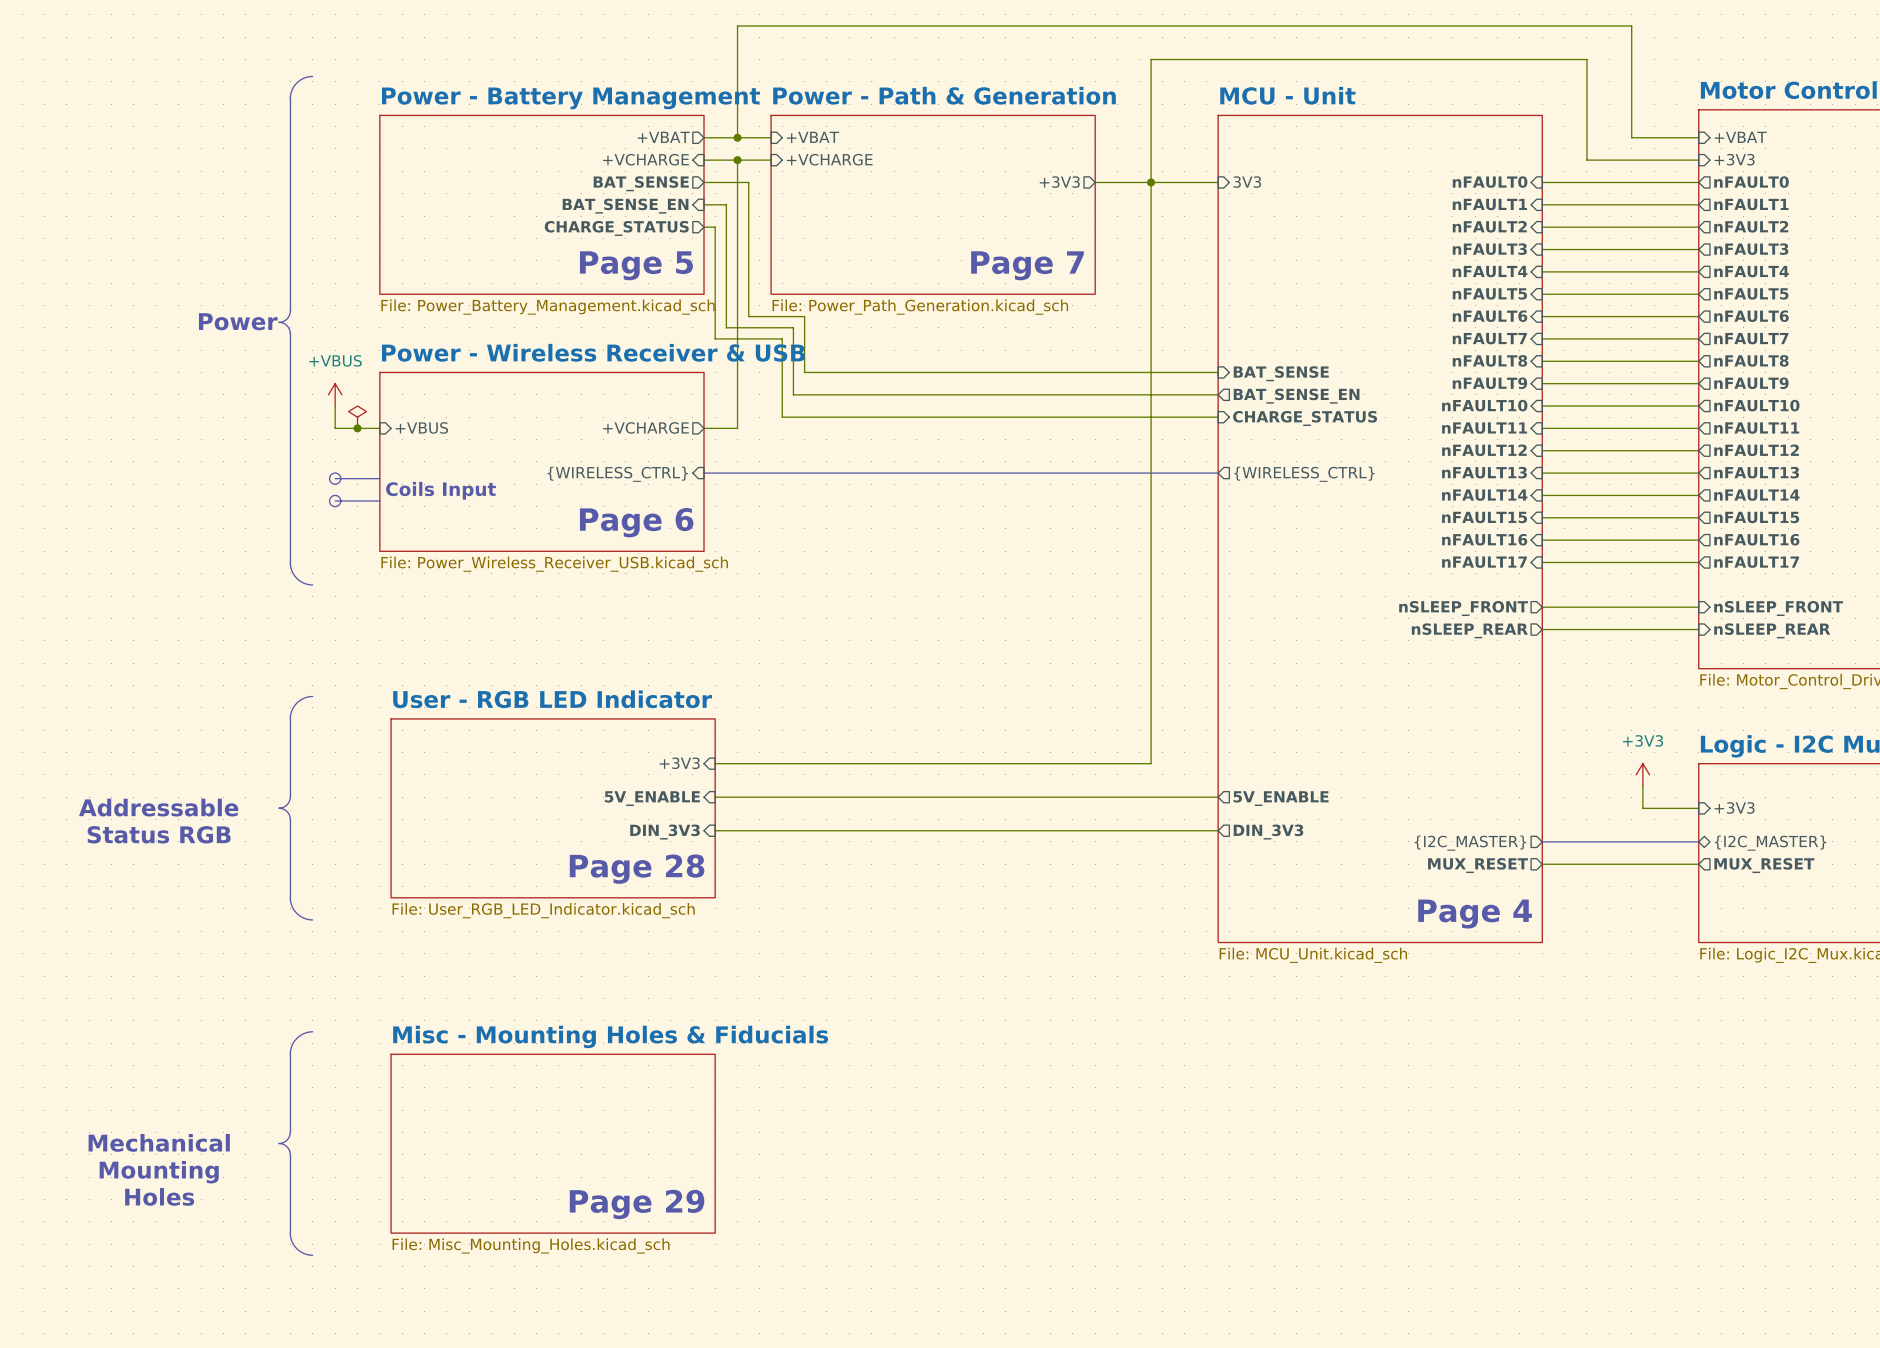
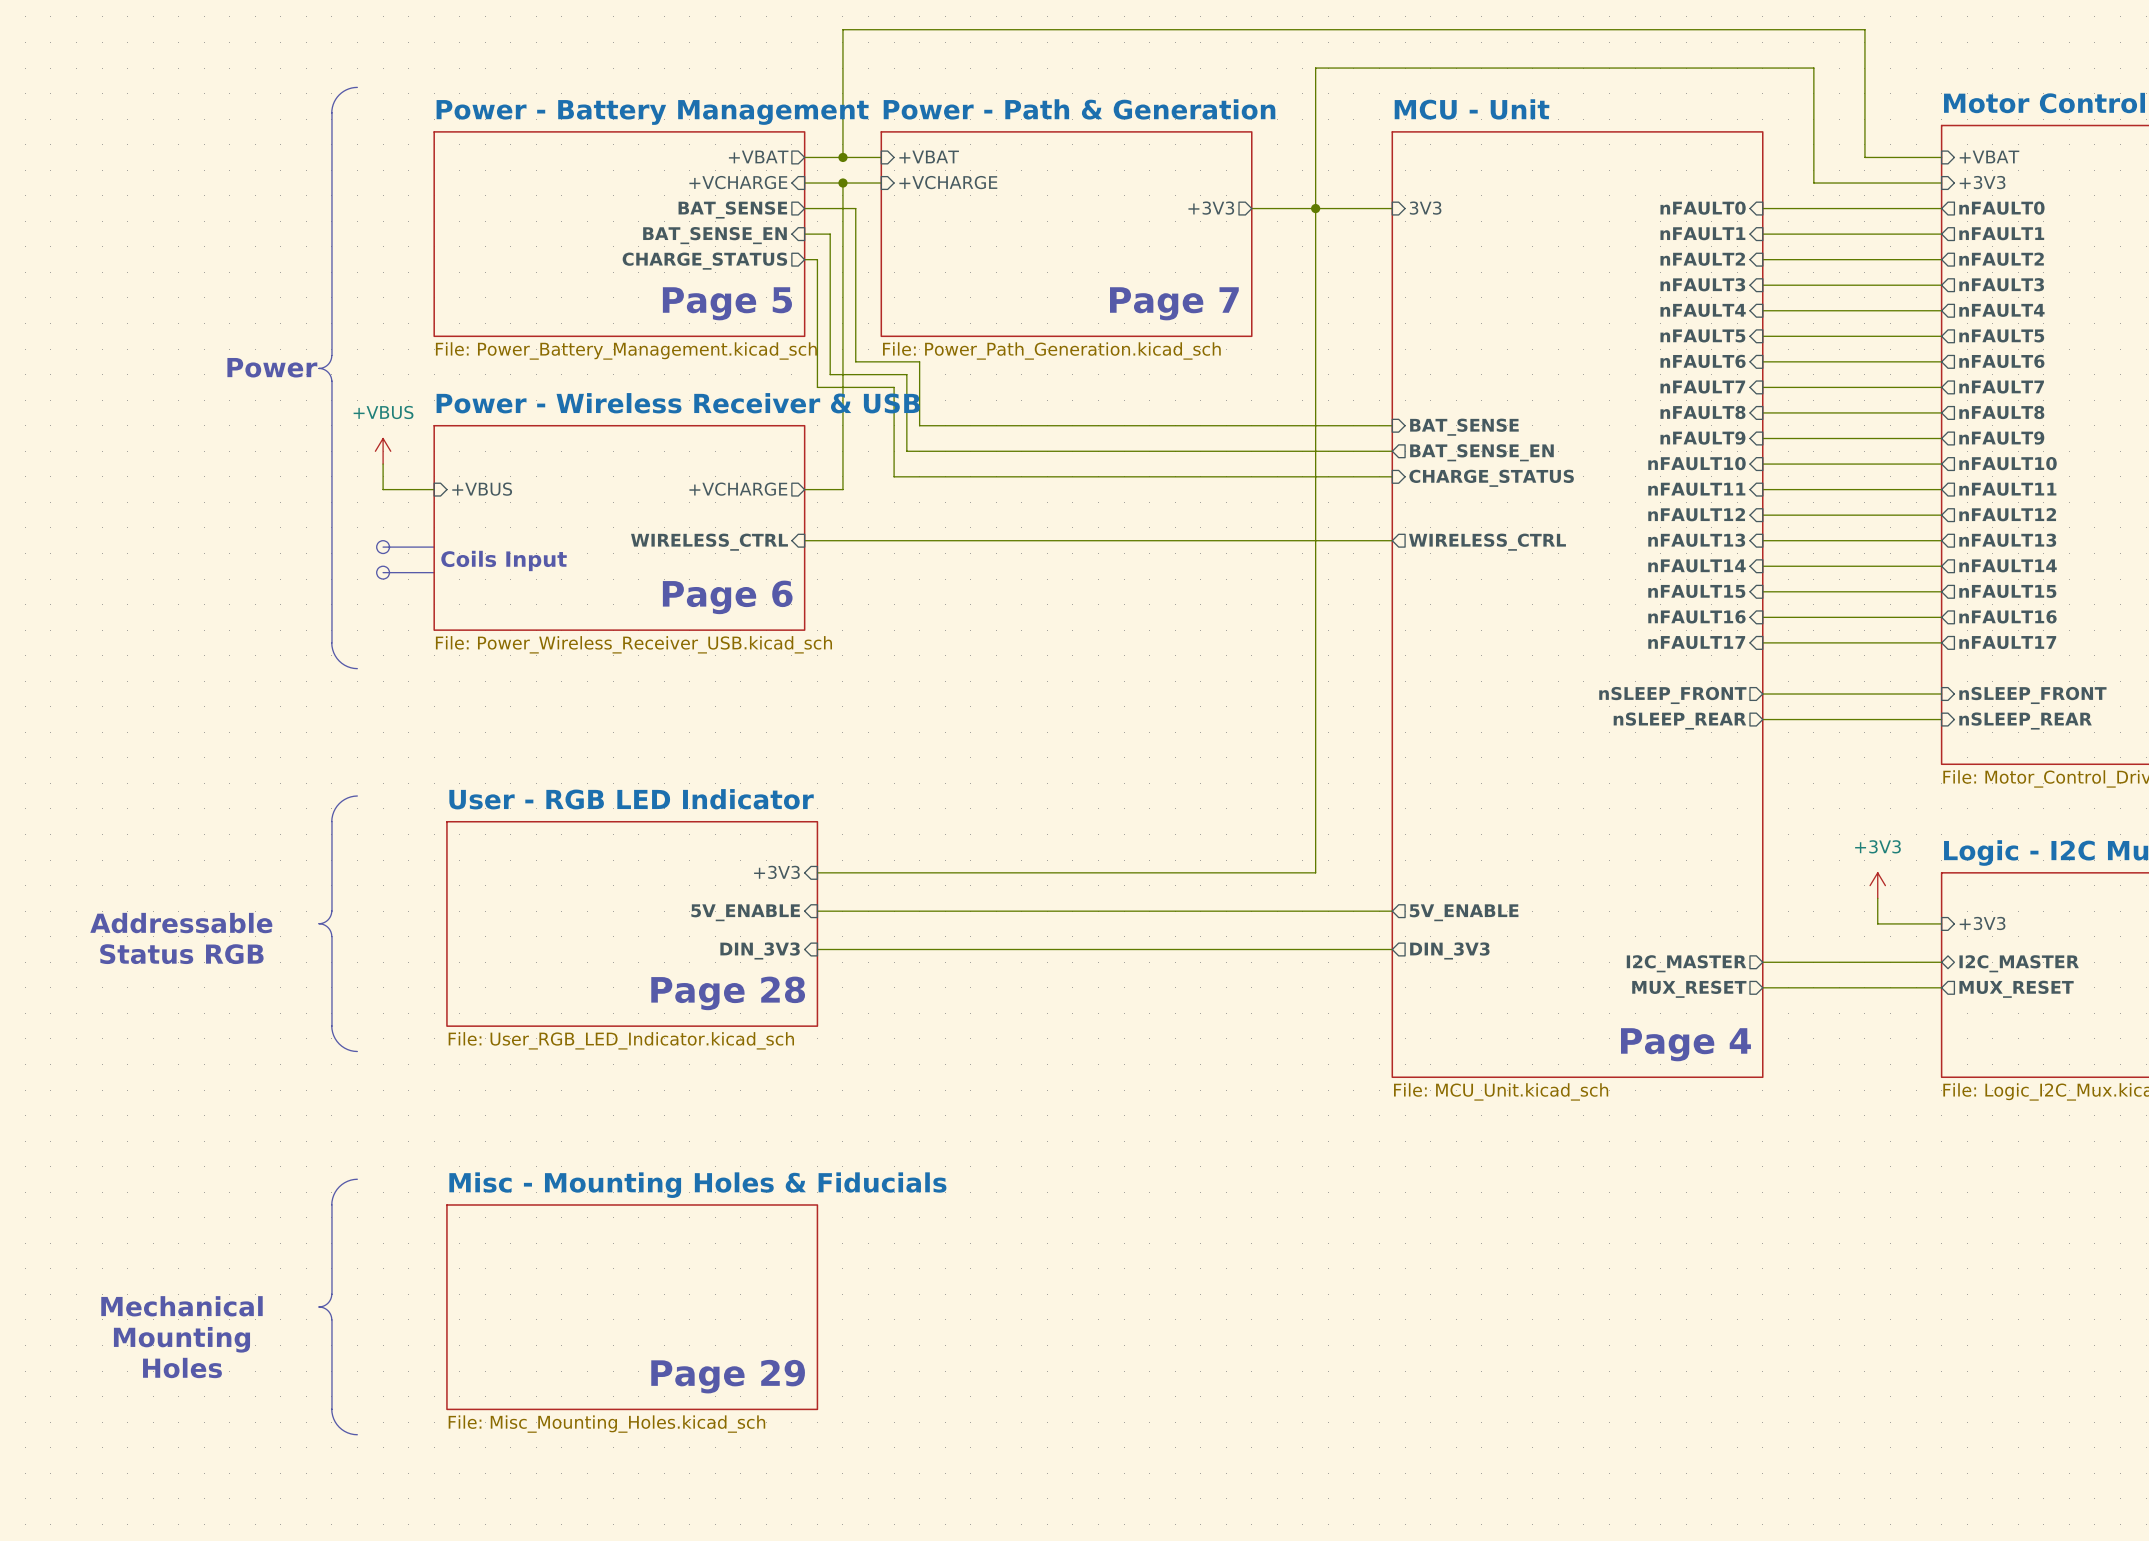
power symbol: (357, 417) -> none
junction: (357, 428) -> none
bus: (704, 473) (1218, 473) -> none
sheet pin: {WIRELESS_CTRL} (617, 474) -> WIRELESS_CTRL (709, 542)
sheet pin: {WIRELESS_CTRL} (1304, 474) -> WIRELESS_CTRL (1487, 542)
bus: (1542, 841) (1698, 841) -> none
sheet pin: {I2C_MASTER} (1470, 843) -> I2C_MASTER (1686, 963)
sheet pin: {I2C_MASTER} (1770, 843) -> I2C_MASTER (2019, 963)

